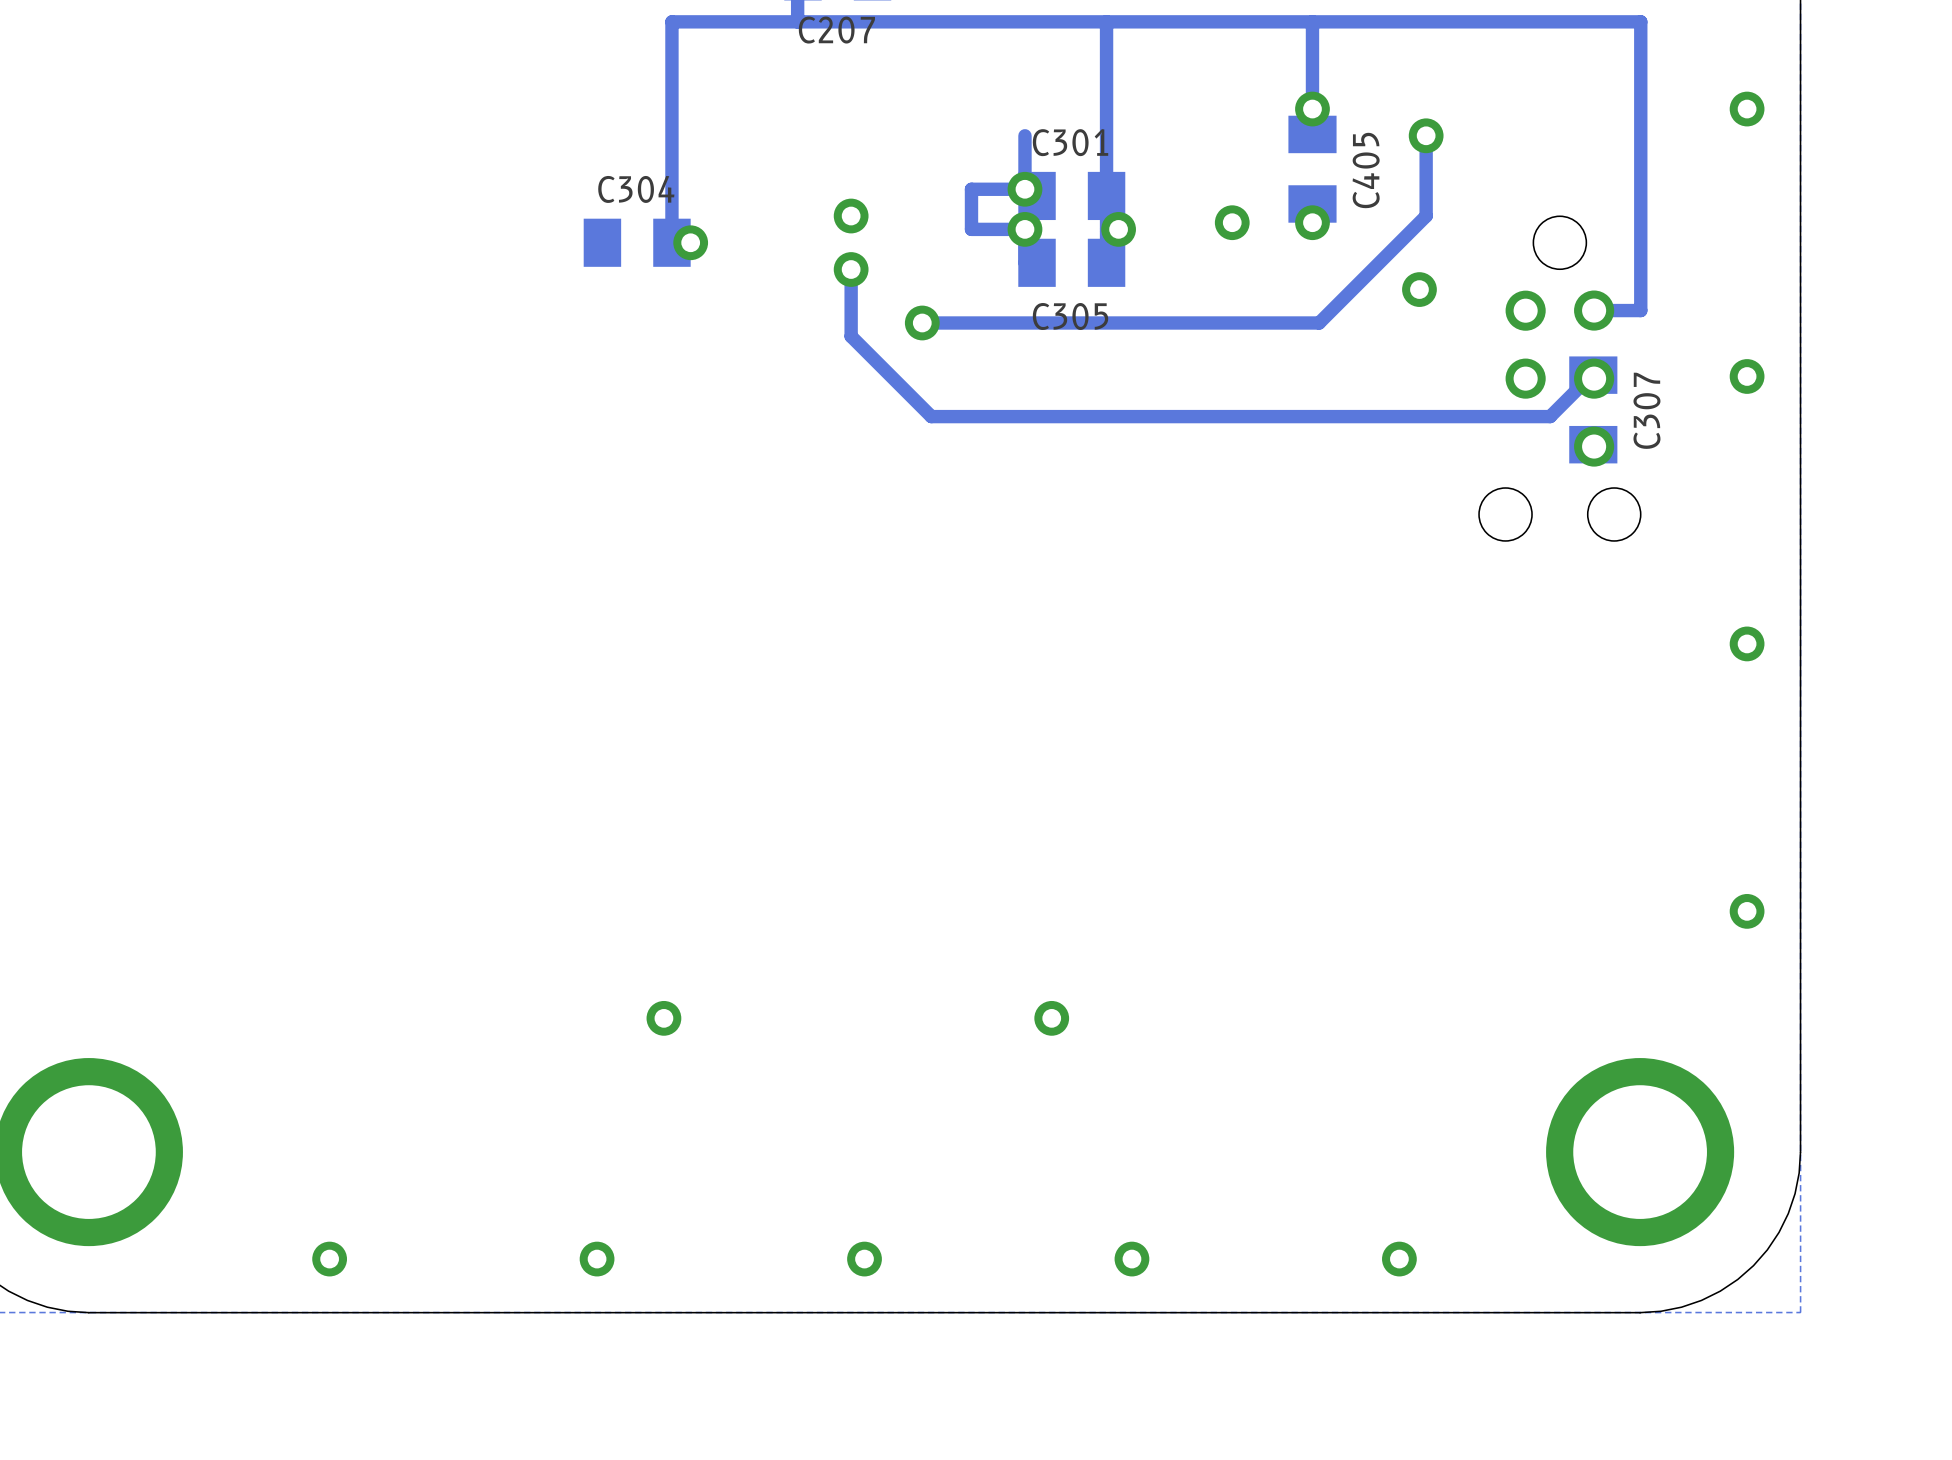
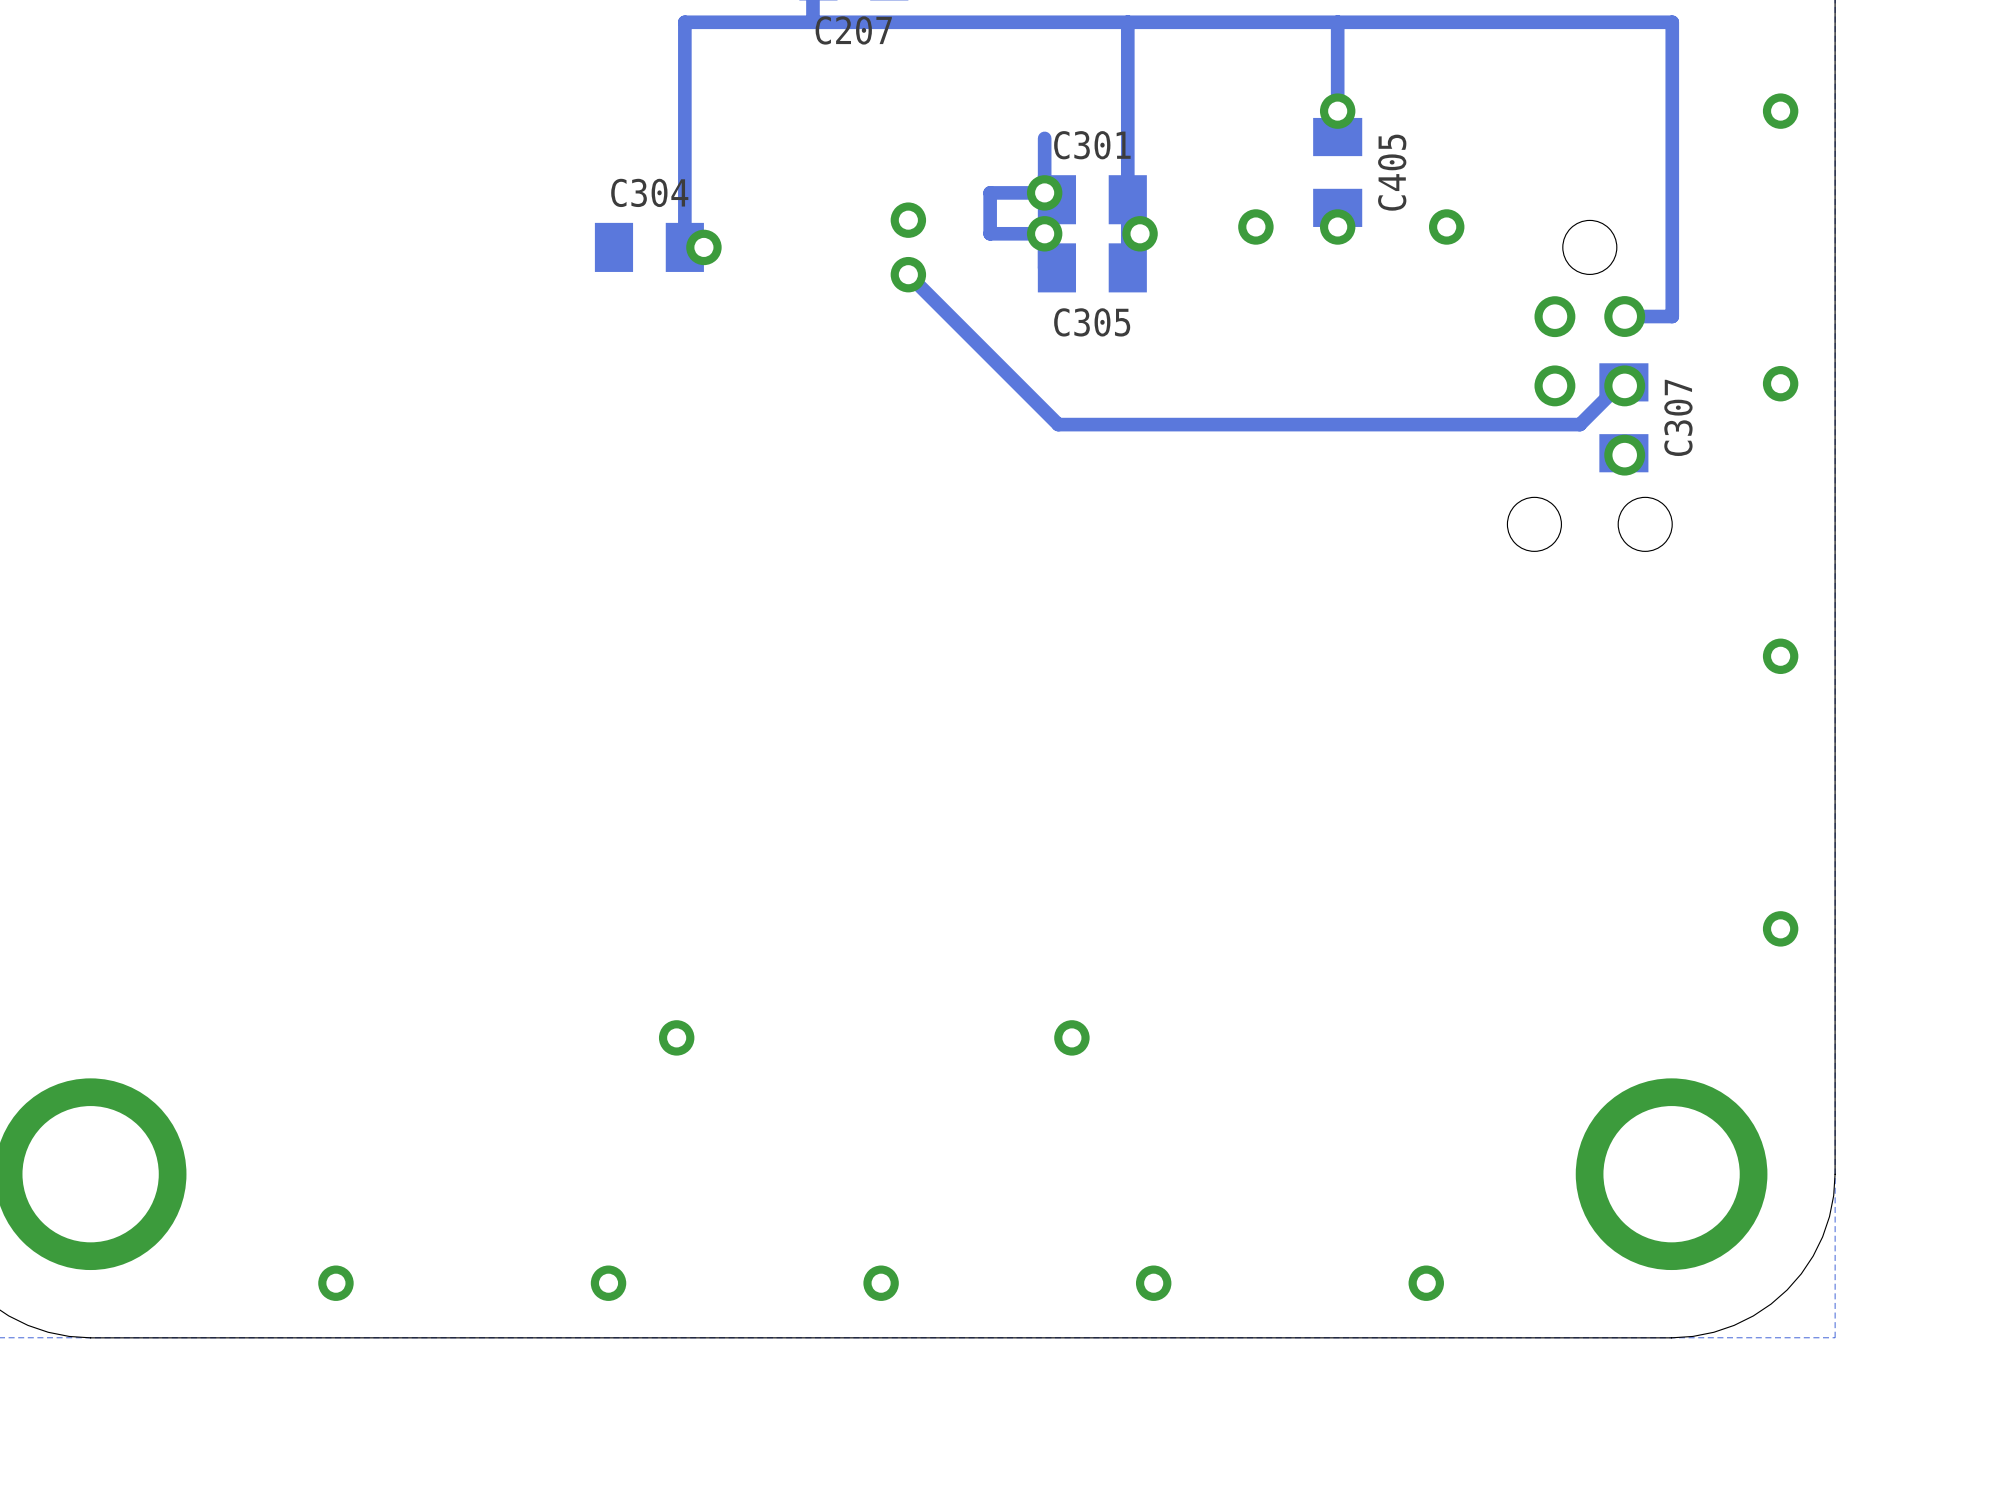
track: (1426, 135) (1426, 216) (1319, 322) (922, 322) -> none
via: (1426, 135) -> none
via: (851, 216) -> none
via: none -> (908, 220)
via: none -> (1446, 226)
track: (851, 269) (851, 336) (931, 416) (1038, 416) -> (908, 274) (1058, 424)
via: (851, 269) -> none
via: none -> (908, 274)
via: (1419, 289) -> none
via: (922, 322) -> none

